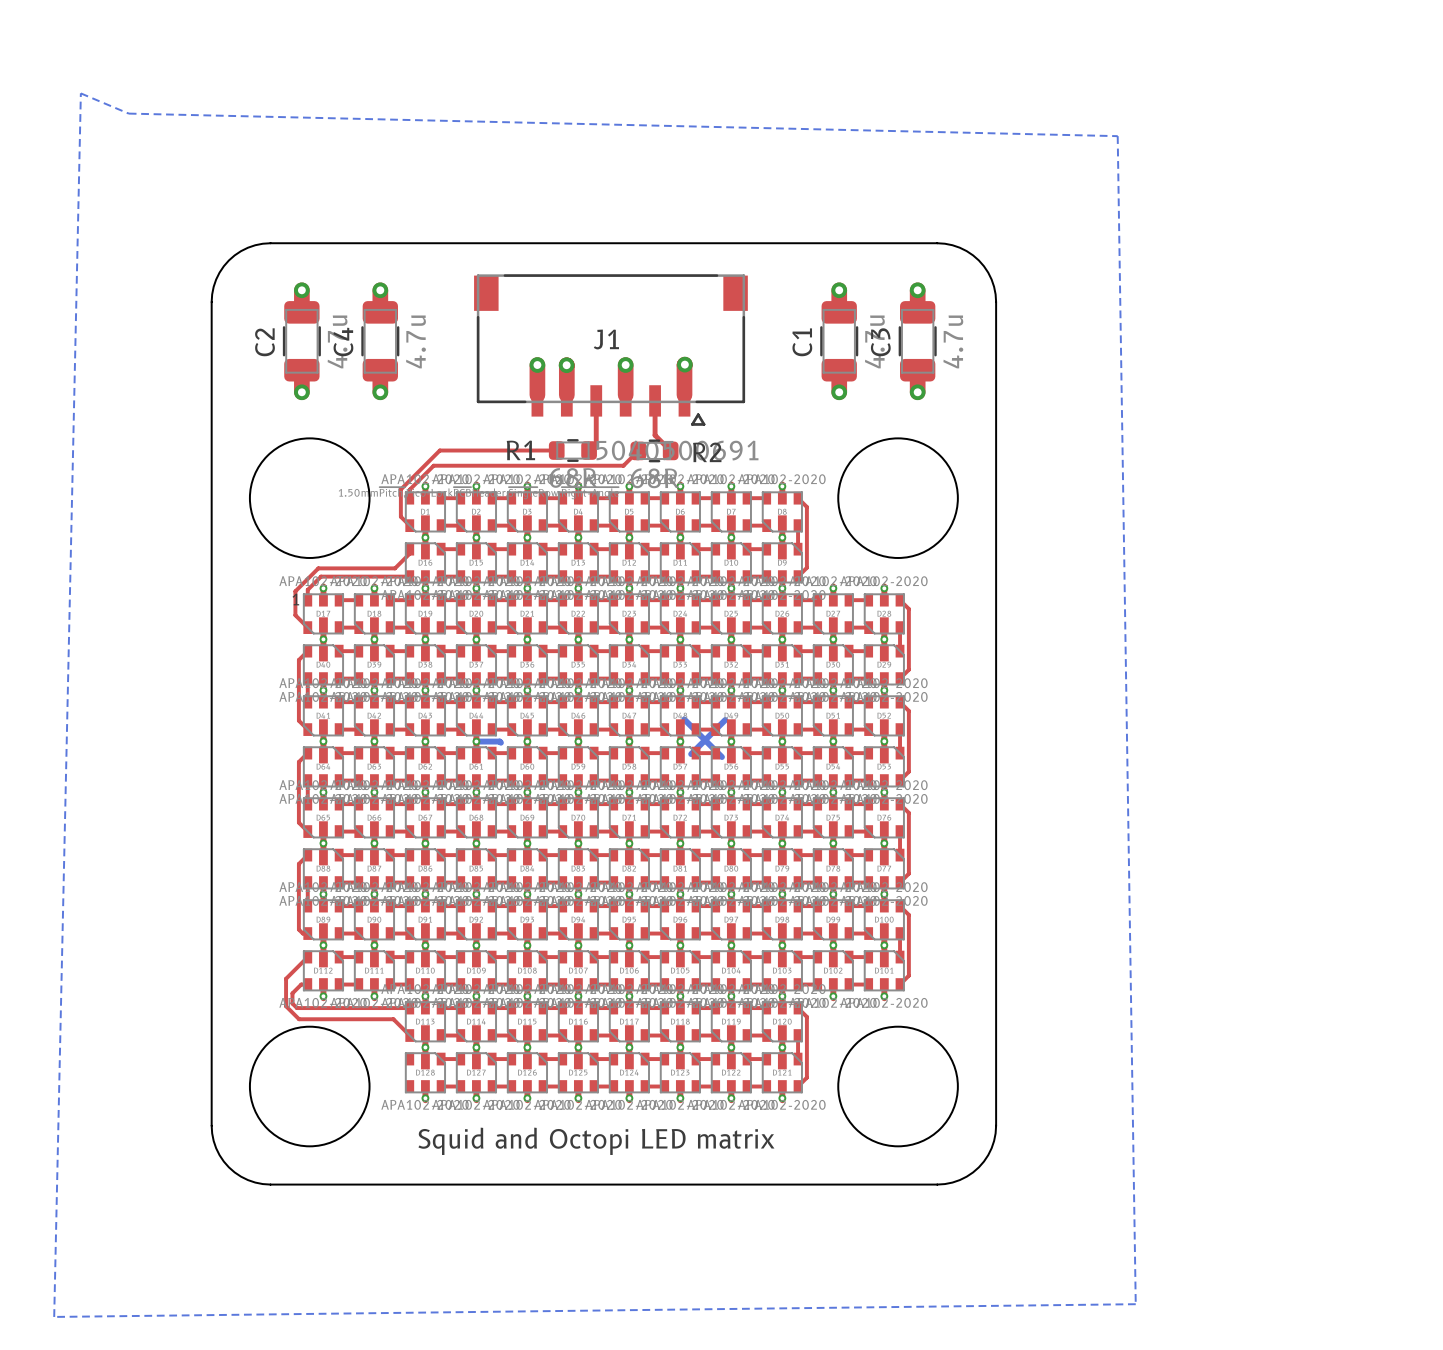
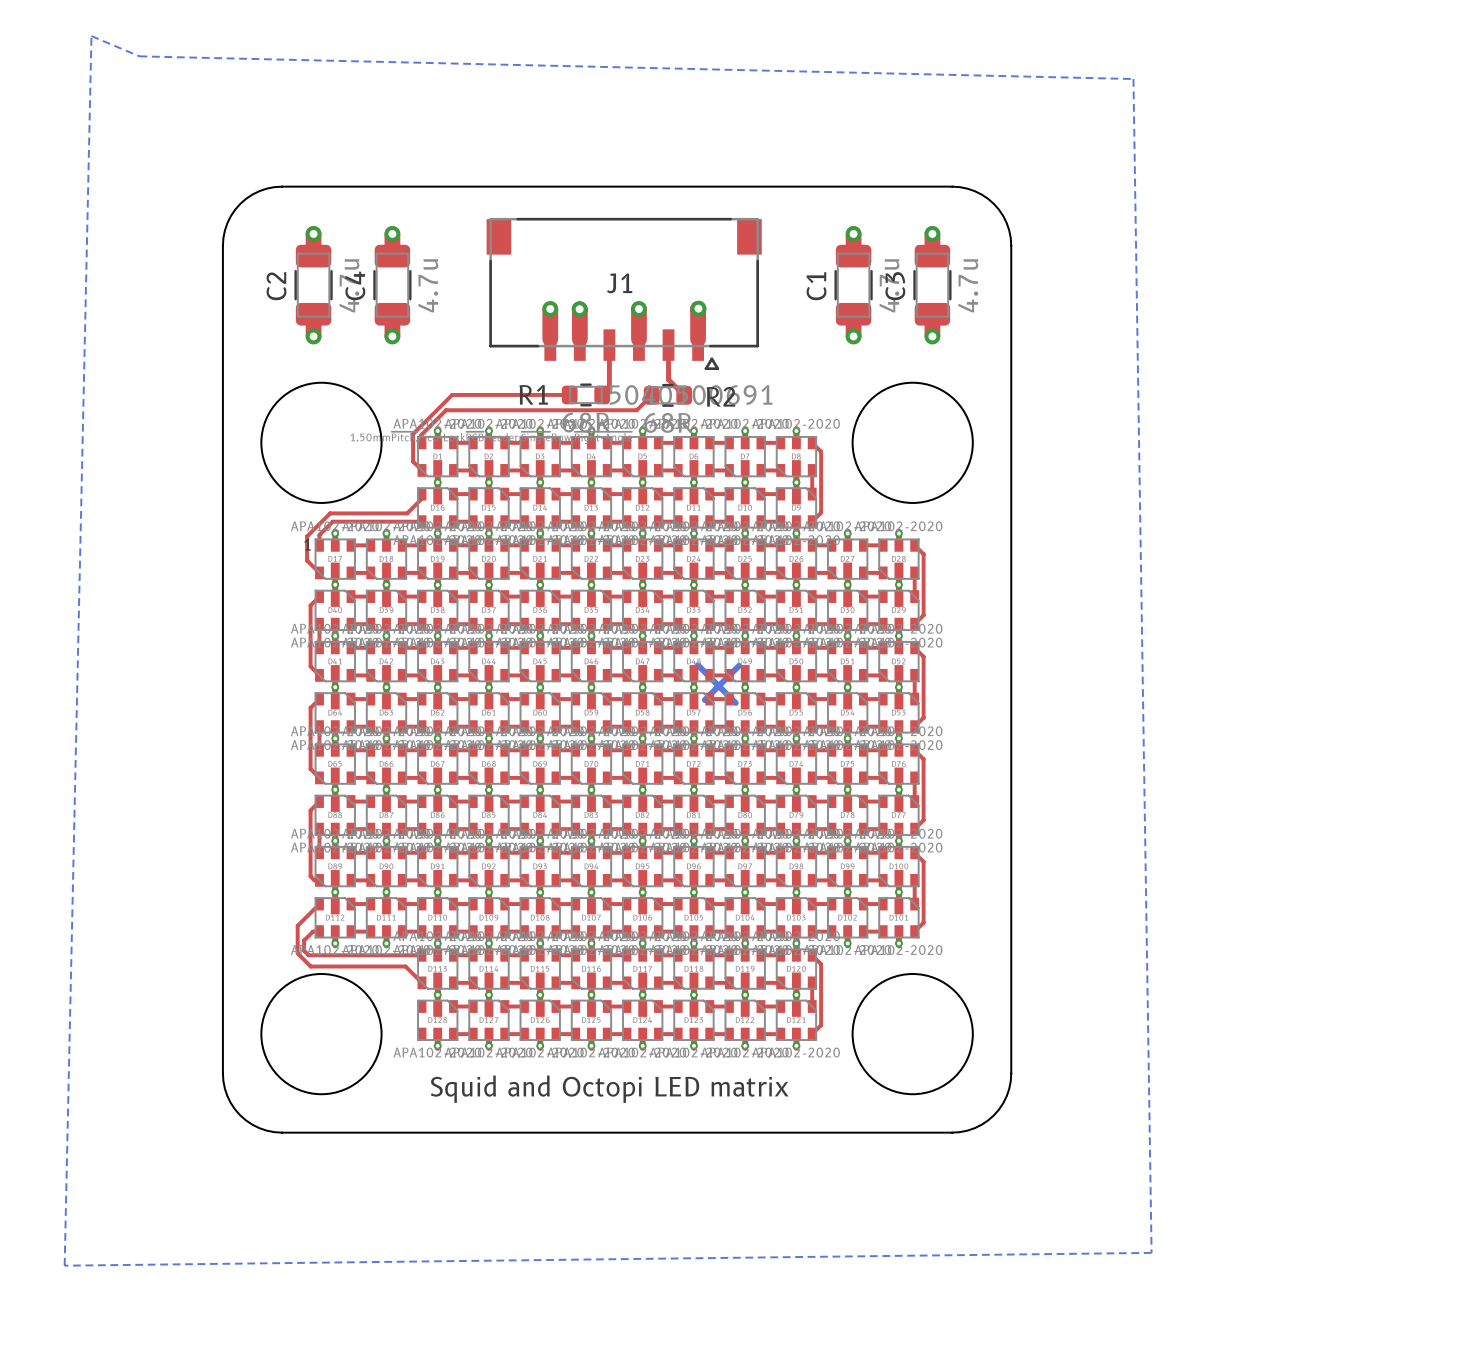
bottom track: (476, 741) (500, 742) -> none

